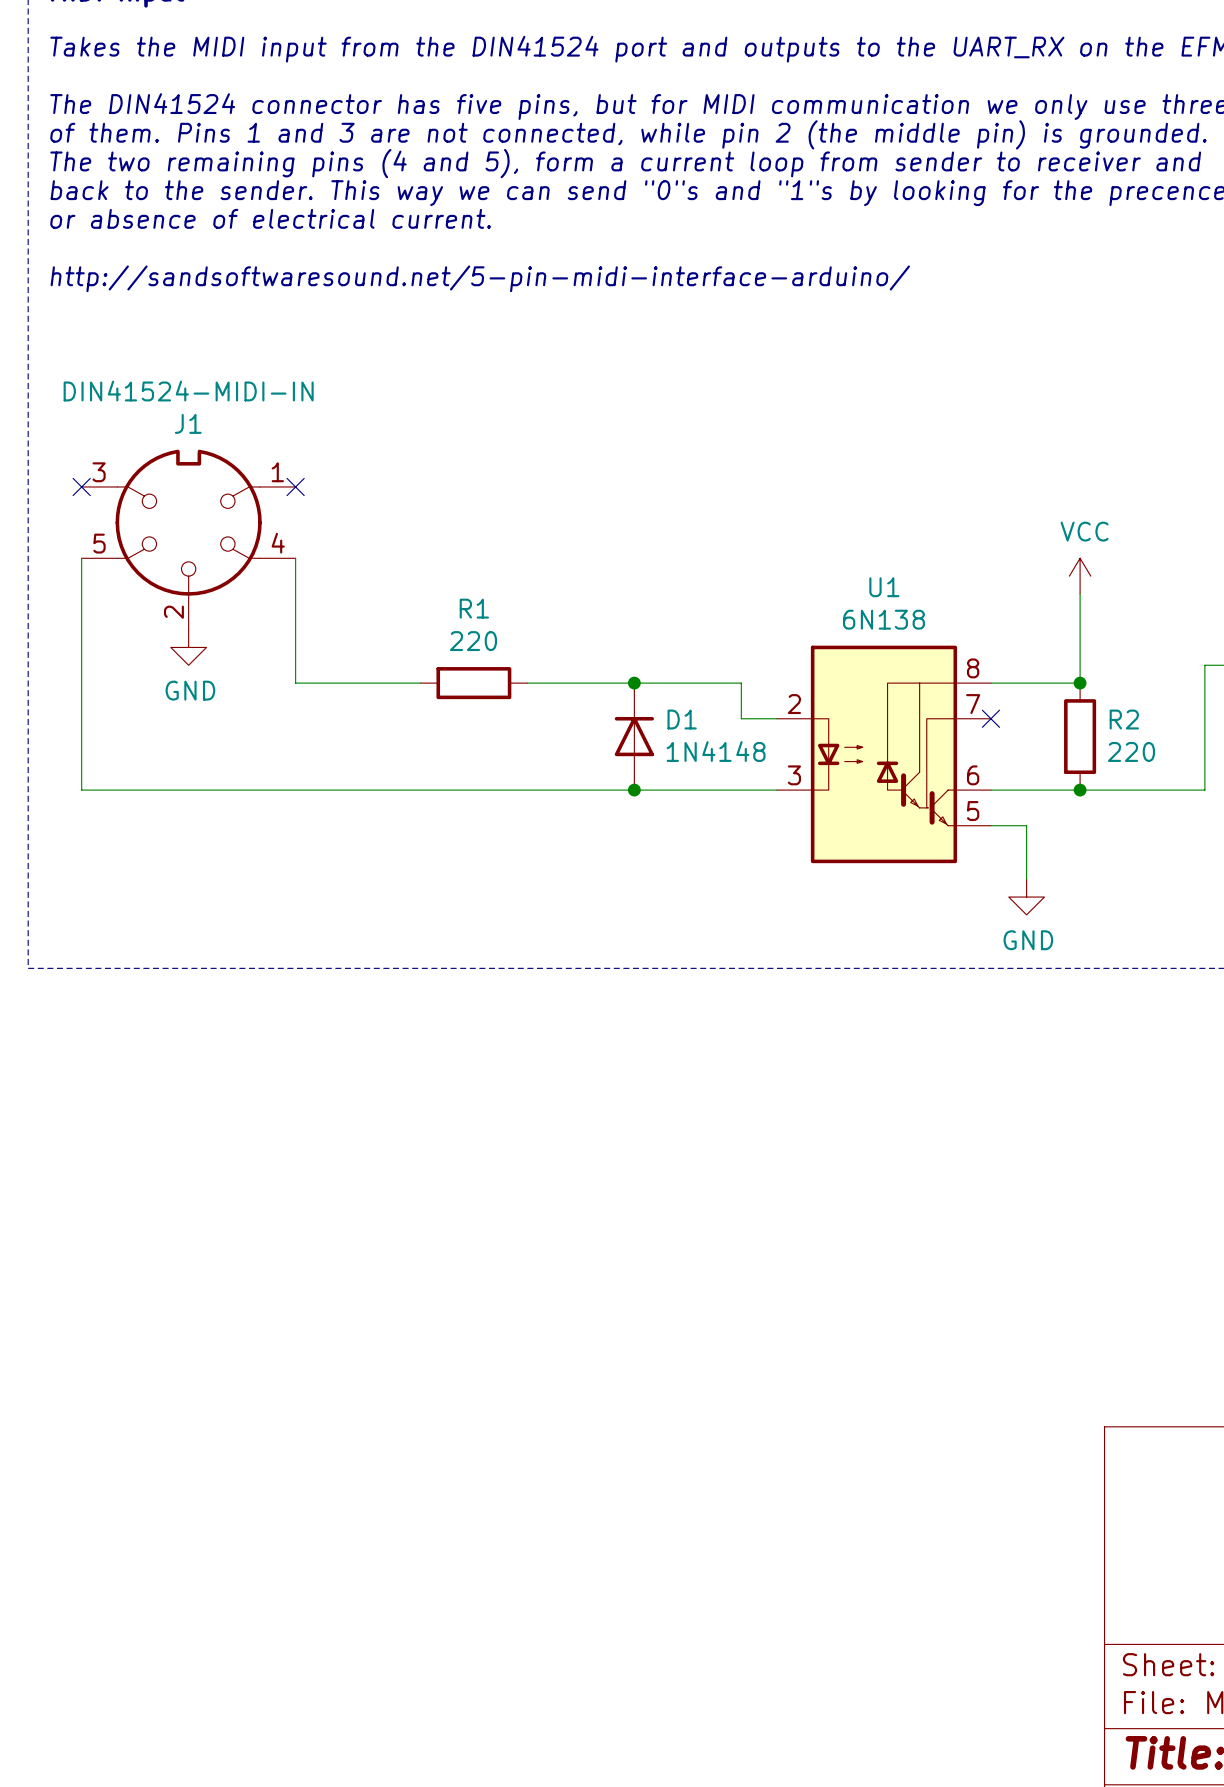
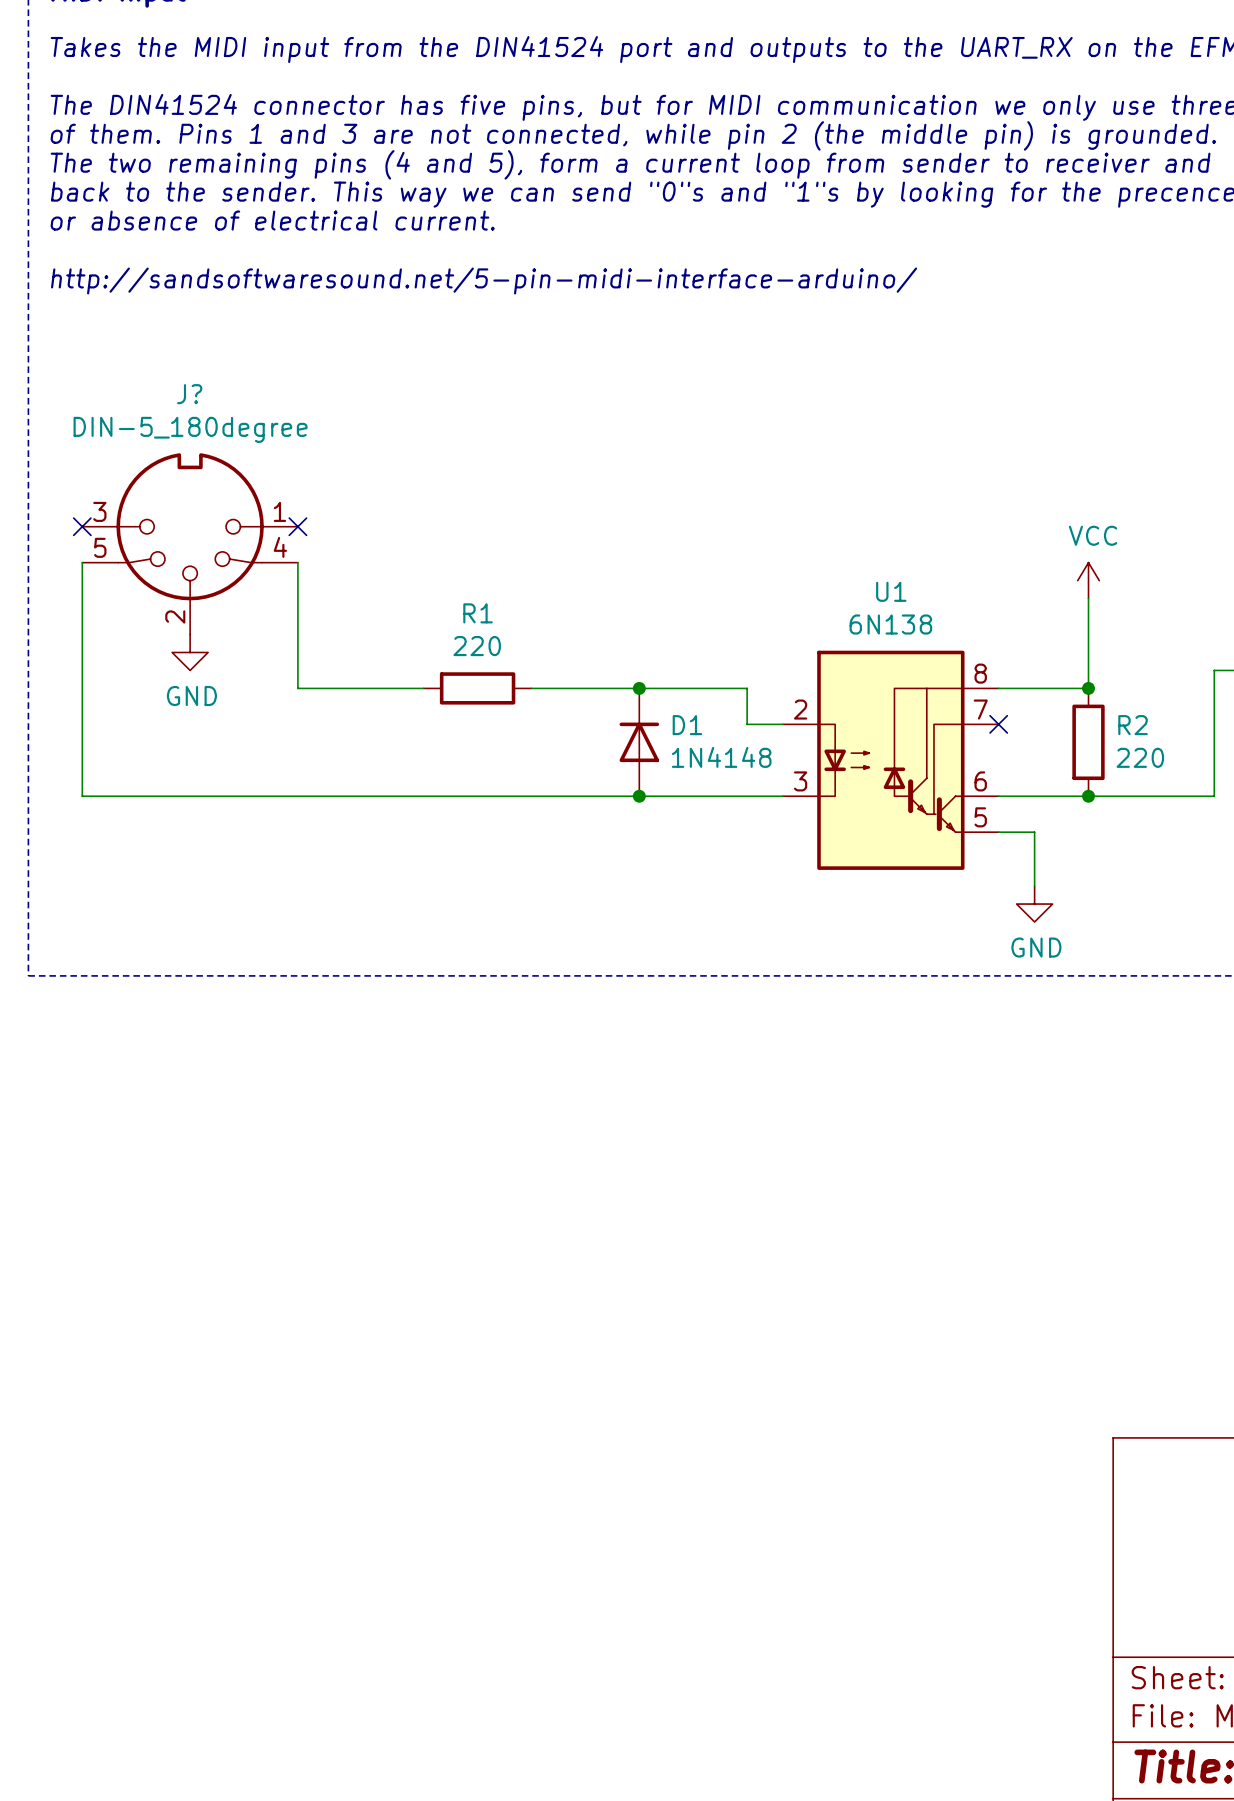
no-connect mark position: (81, 486) -> (82, 526)
no-connect mark position: (295, 486) -> (297, 526)
J1: DIN41524-MIDI-IN (188, 539) -> none
J?: none -> DIN-5_180degree (190, 543)

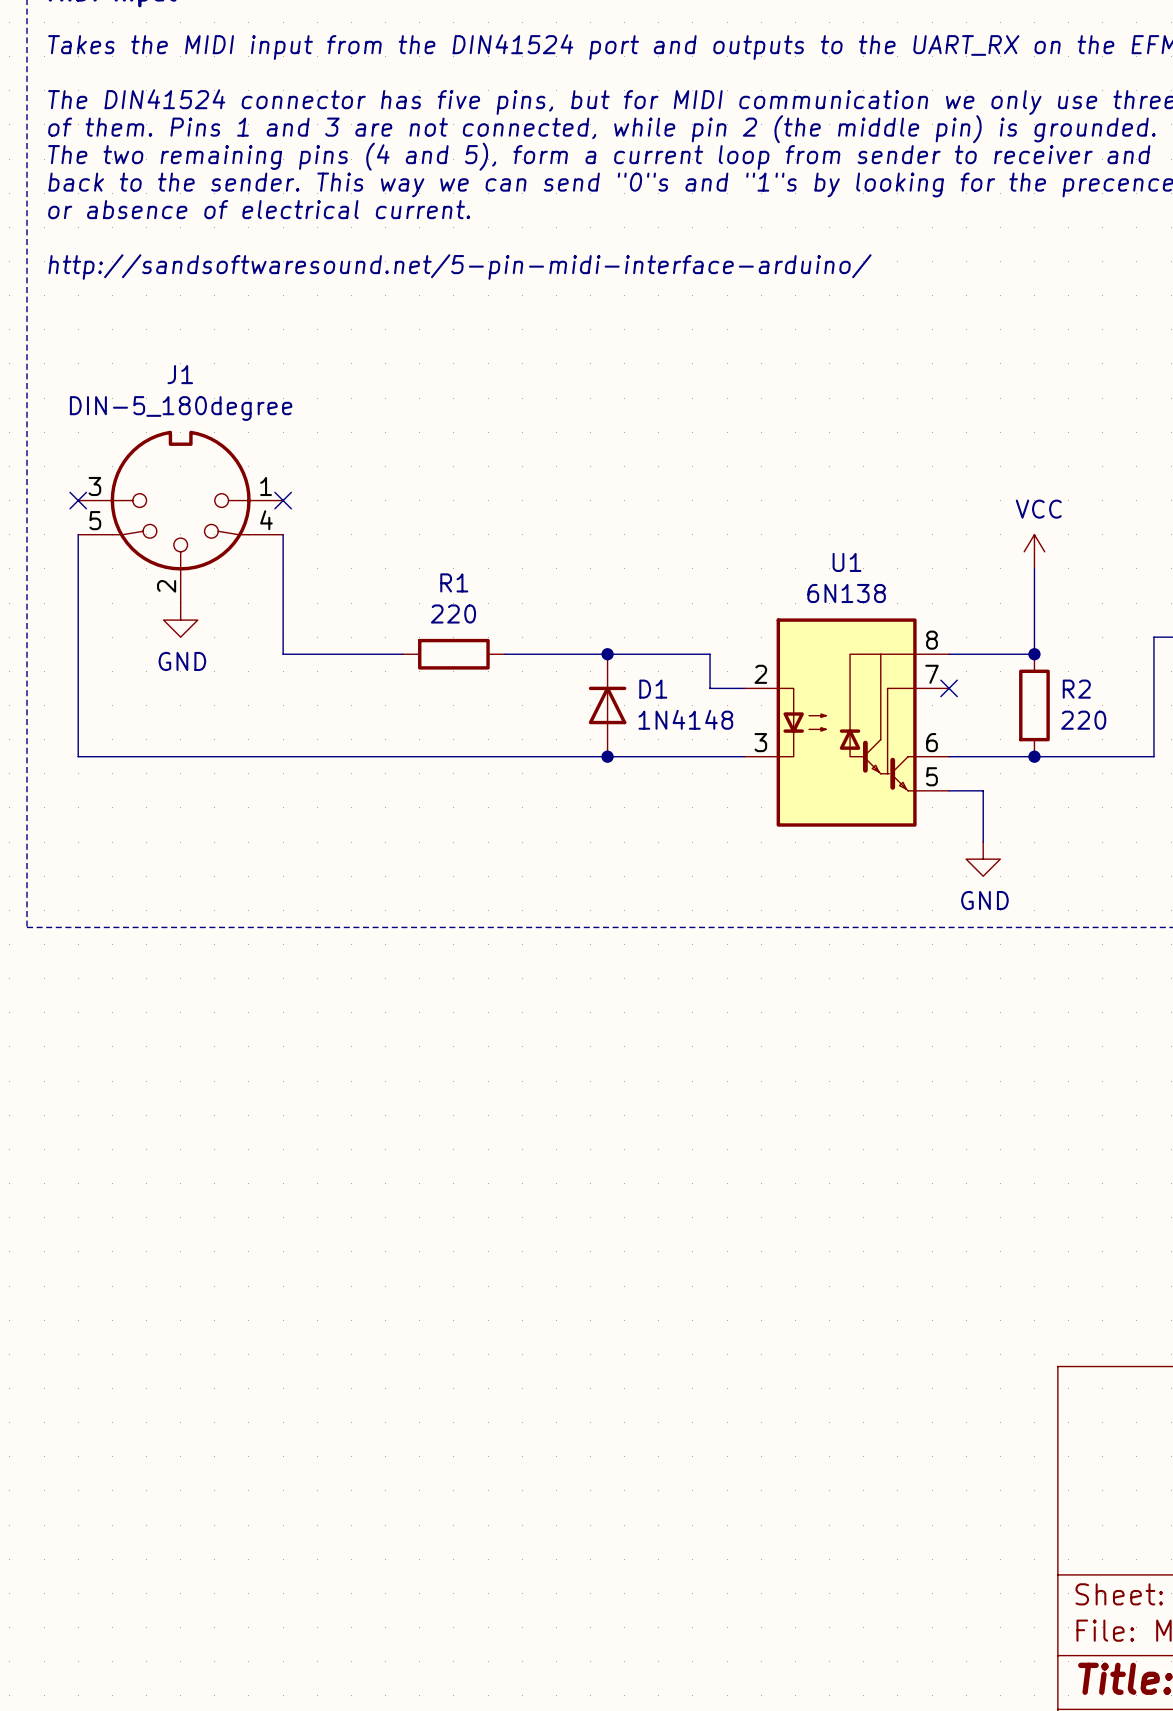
J? name: J? (189, 394) -> J1 (180, 374)

